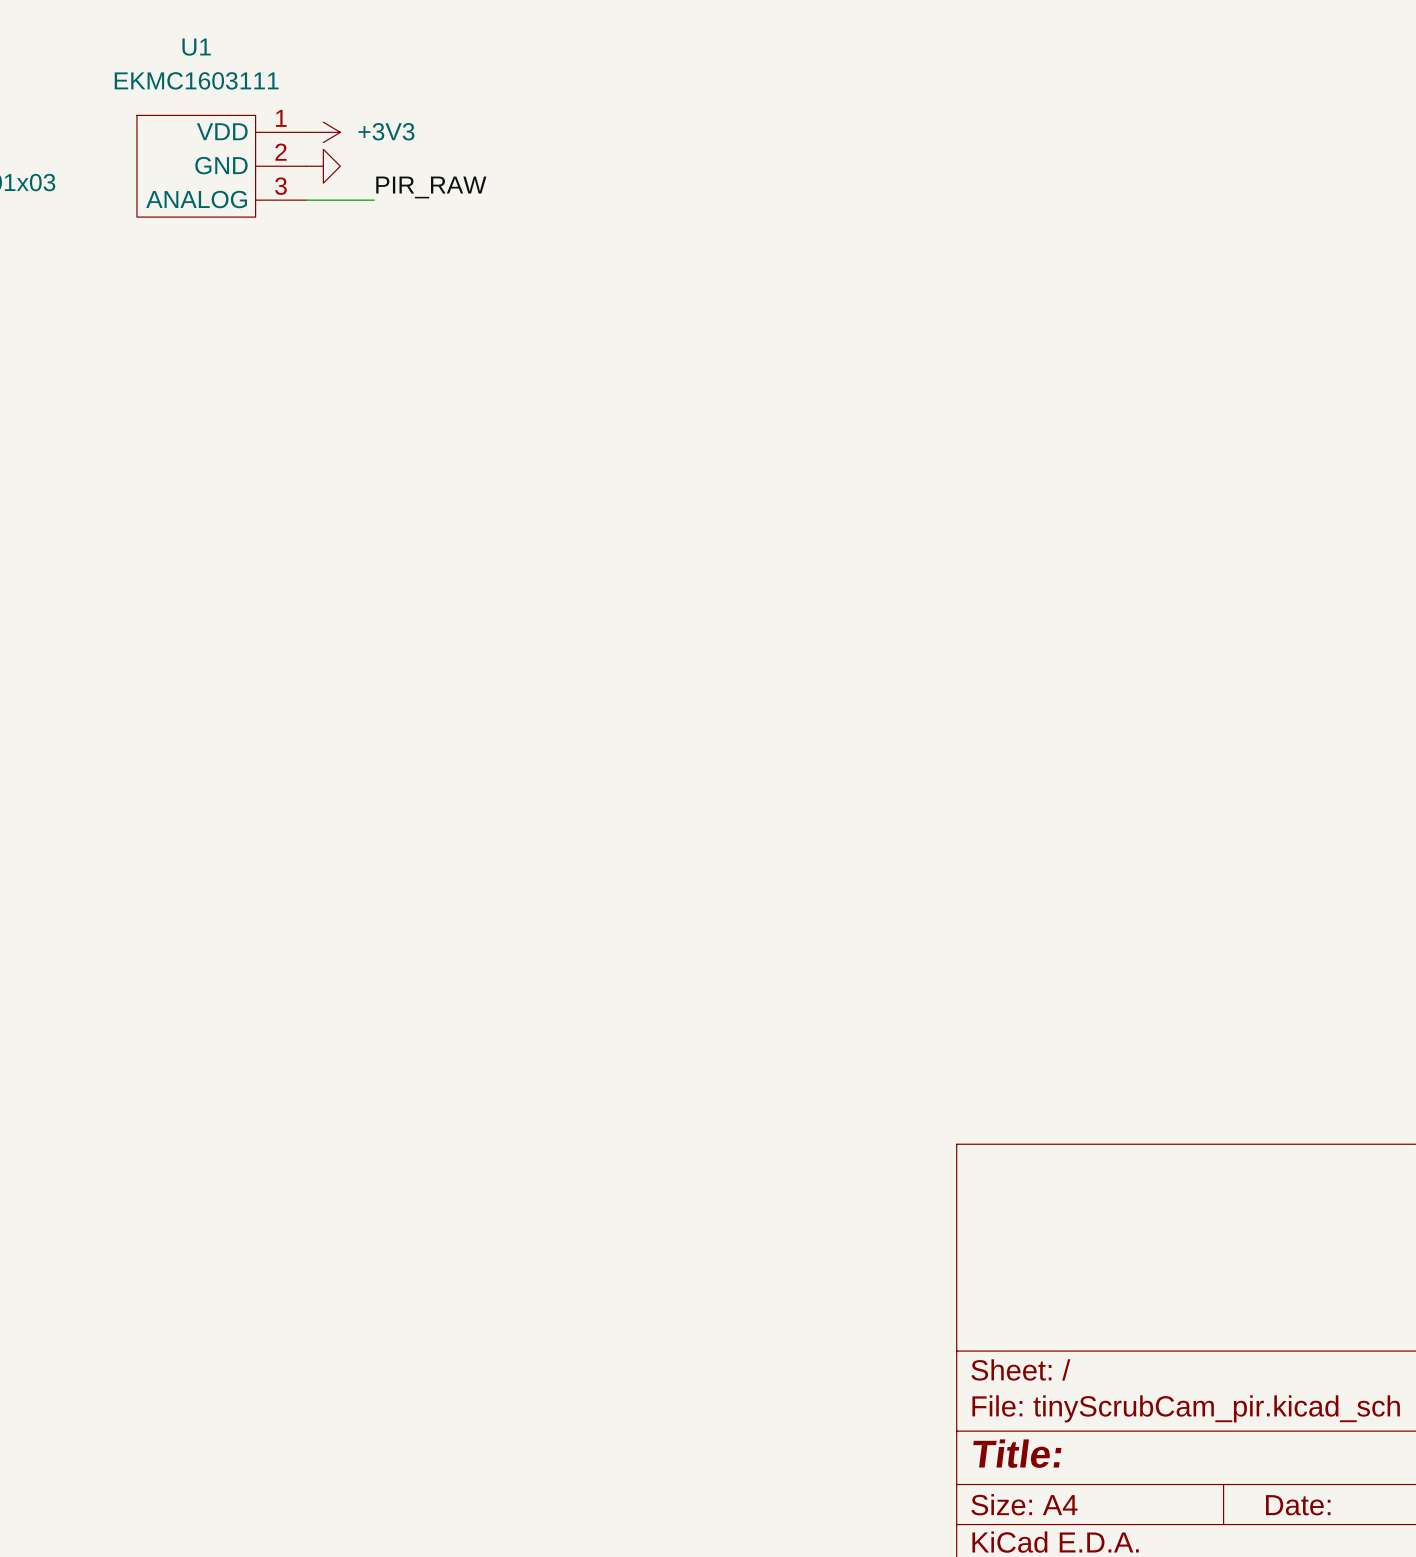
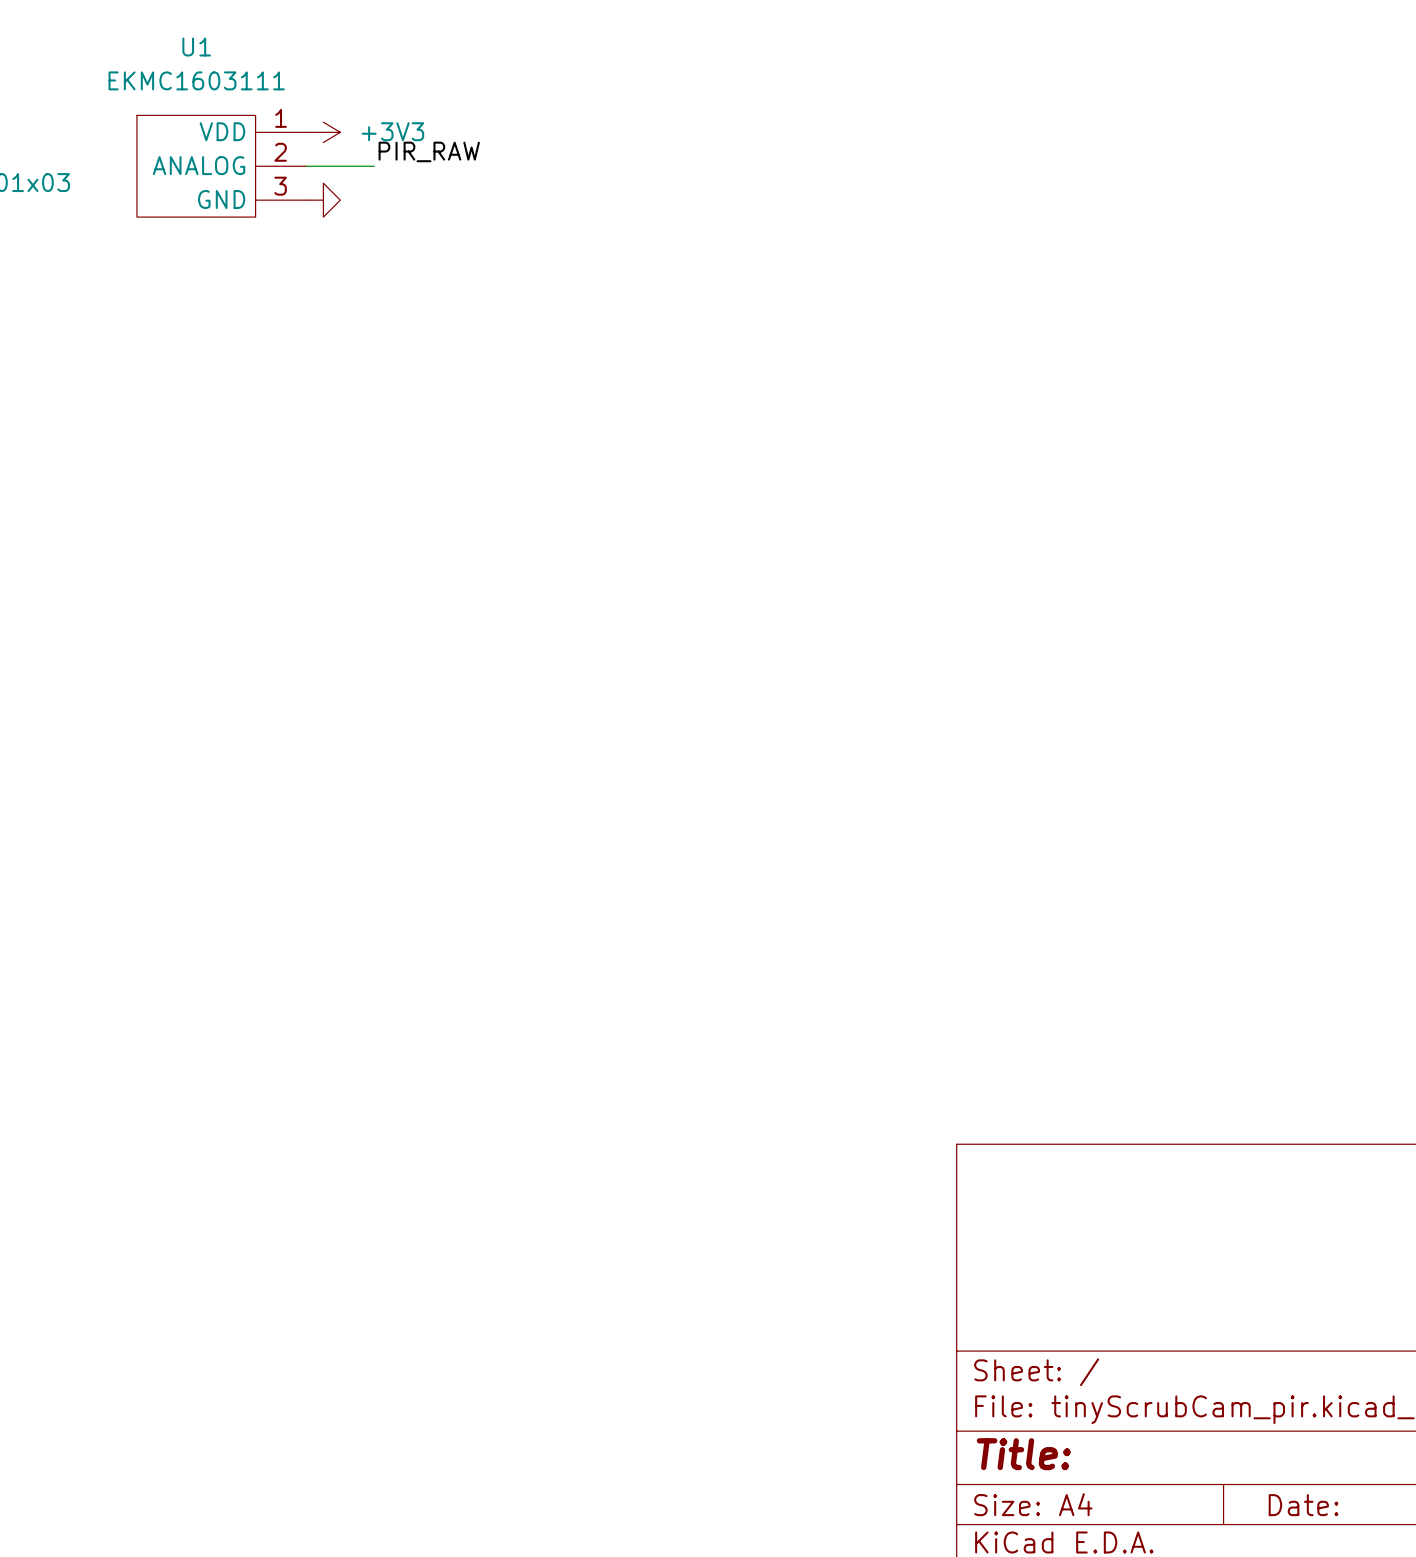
U1 pin name: GND (221, 165) -> ANALOG (199, 165)
power symbol position: (323, 166) -> (323, 200)
label position: PIR_RAW (431, 187) -> PIR_RAW (429, 151)
U1 pin name: ANALOG (196, 199) -> GND (221, 199)
wire: (306, 200) (374, 200) -> (306, 166) (374, 166)

